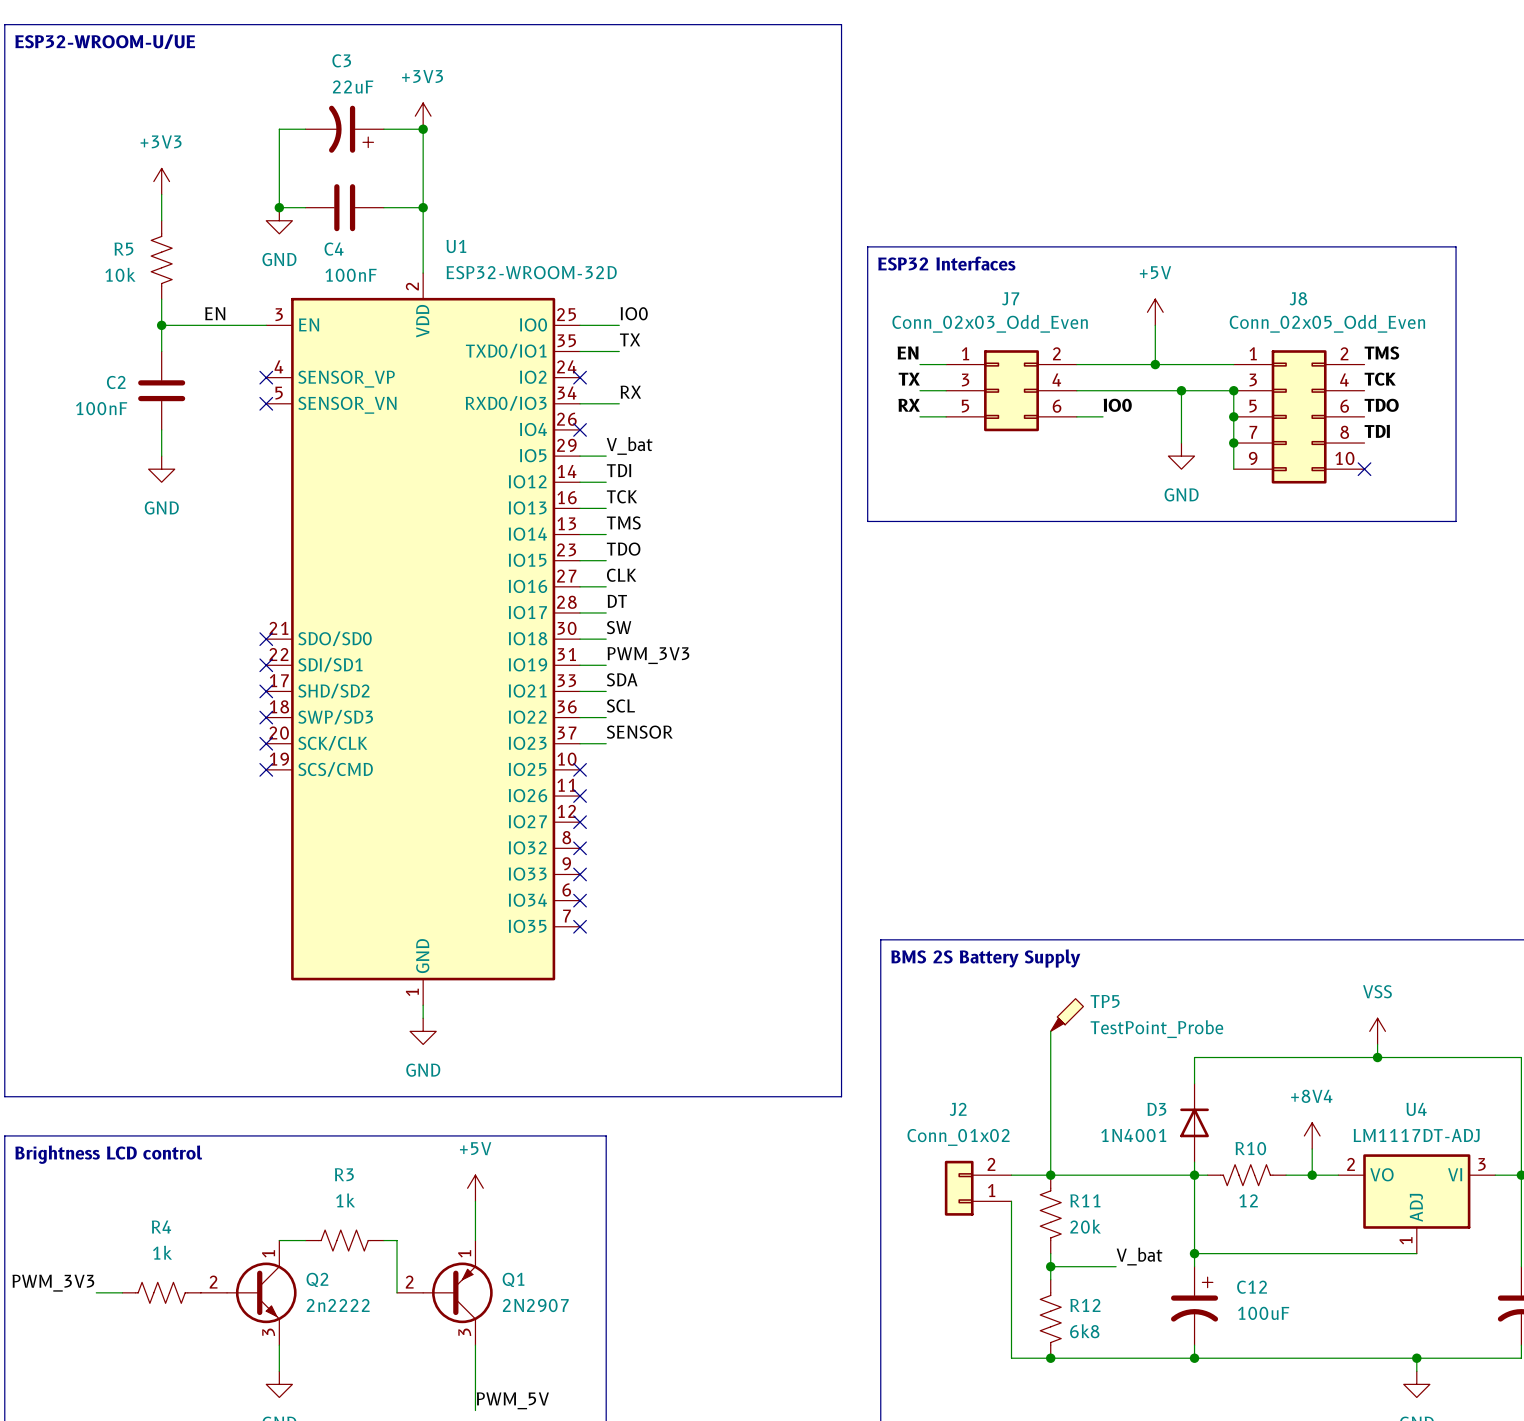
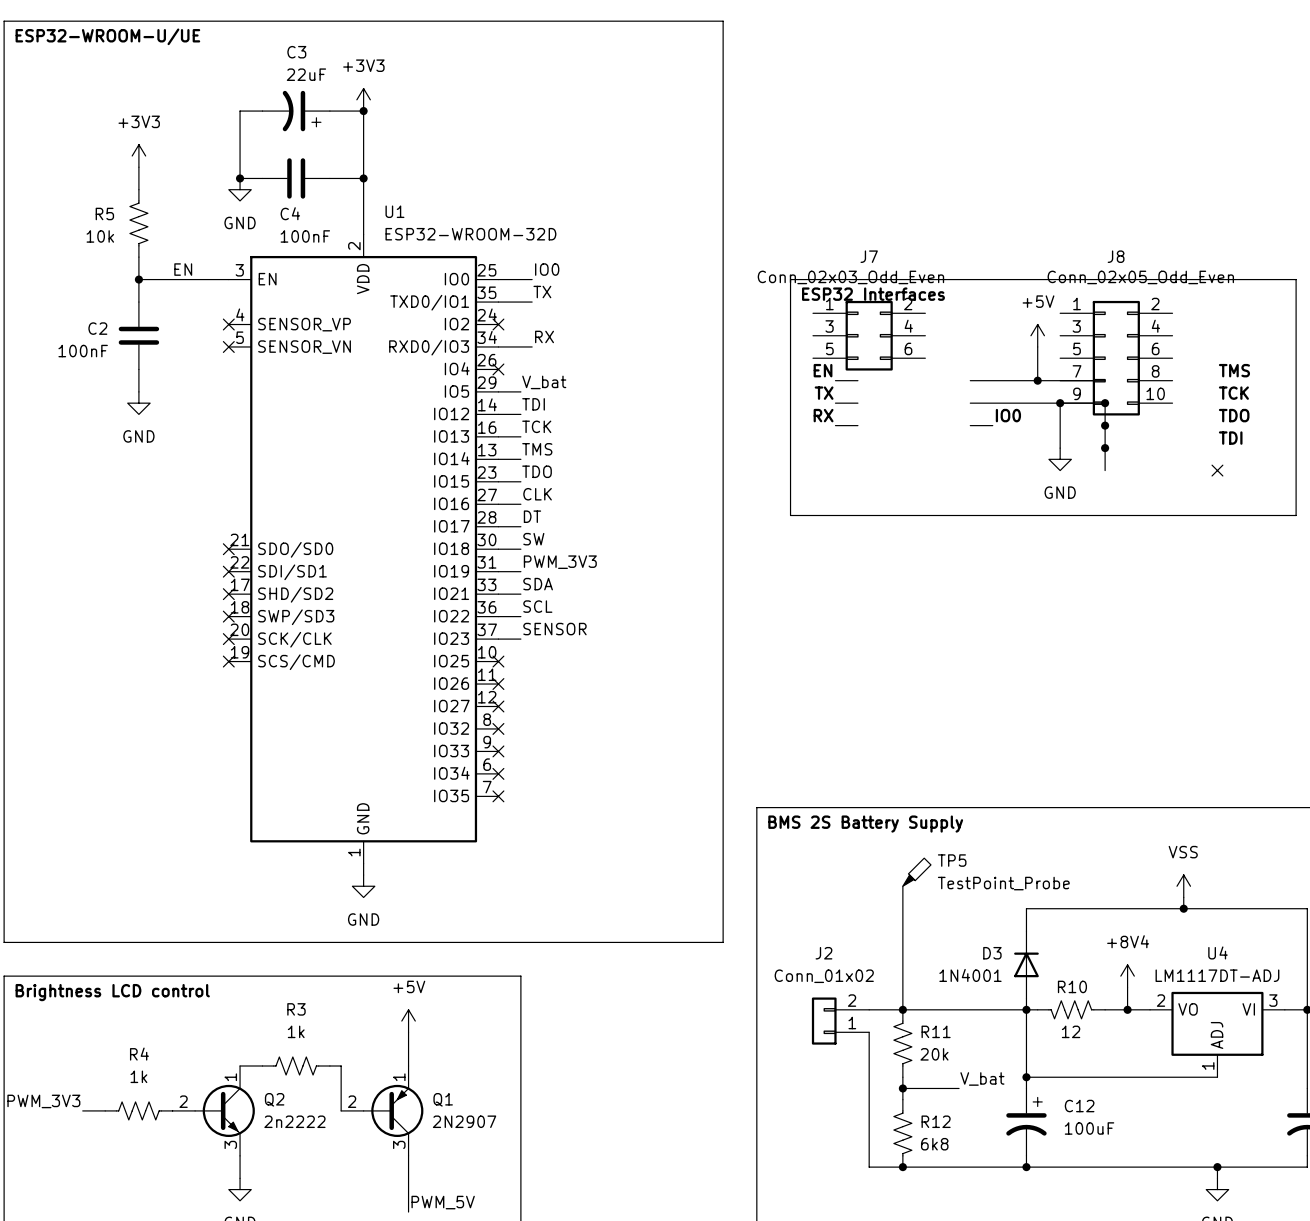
line: (867, 246) (1456, 246) (1456, 521) (867, 521) (867, 246) -> (790, 279) (1296, 279) (1296, 515) (790, 515) (790, 279)
text position: ESP32 Interfaces (946, 263) -> ESP32 Interfaces (873, 294)
power symbol position: +5V (1155, 312) -> +5V (1037, 335)
wire: (1155, 325) (1155, 364) -> (1037, 346) (1037, 380)
label position: EN (908, 352) -> EN (823, 370)
label position: TMS (1381, 352) -> TMS (1234, 370)
wire: (919, 364) (946, 364) -> (835, 380) (857, 380)
wire: (1076, 364) (1233, 364) -> (970, 380) (1105, 380)
junction: (1155, 364) -> none
label position: TX (909, 379) -> TX (824, 393)
label position: TCK (1380, 379) -> TCK (1233, 393)
wire: (919, 390) (946, 390) -> (835, 403) (857, 403)
wire: (1076, 390) (1233, 390) (1233, 469) -> (1060, 448) (1060, 403)
wire: (1181, 390) (1181, 443) -> none
junction: (1181, 390) -> none
junction: (1233, 390) -> none
label position: RX (909, 405) -> RX (823, 415)
label position: IO0 (1117, 405) -> IO0 (1008, 415)
label position: TDO (1381, 405) -> TDO (1234, 415)
wire: (919, 416) (946, 416) -> (835, 425) (857, 425)
wire: (1076, 416) (1103, 416) -> (970, 425) (992, 425)
junction: (1233, 416) -> none
label position: TDI (1377, 431) -> TDI (1230, 438)
junction: none -> (1037, 380)
junction: (1233, 443) -> none
power symbol position: GND (1181, 456) -> GND (1060, 459)
wire: none -> (970, 403) (1105, 403) (1105, 470)
junction: none -> (1060, 403)
junction: none -> (1105, 403)
no-connect mark: (1364, 469) -> none
junction: none -> (1105, 425)
junction: none -> (1105, 448)
no-connect mark: none -> (1217, 470)

